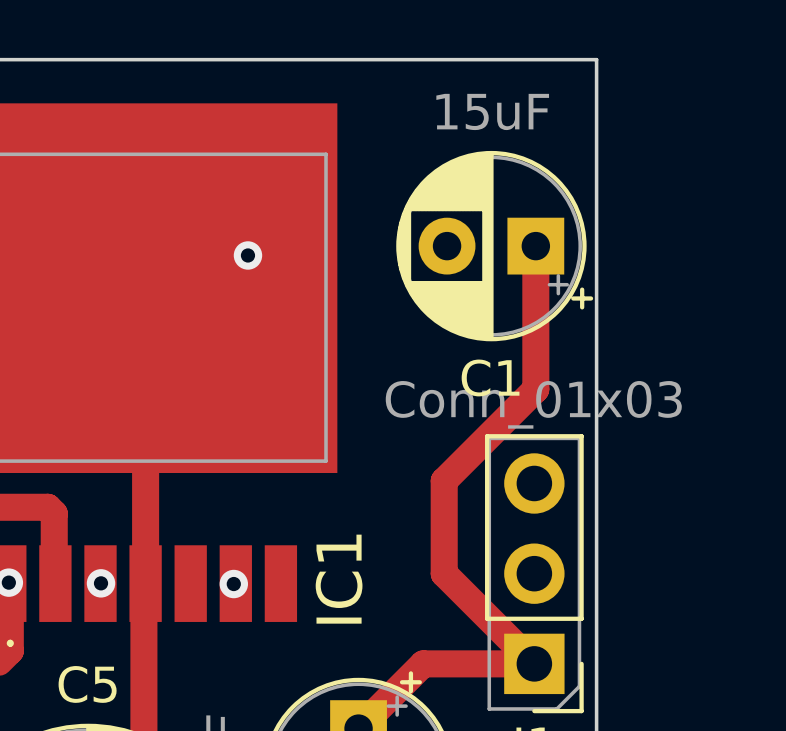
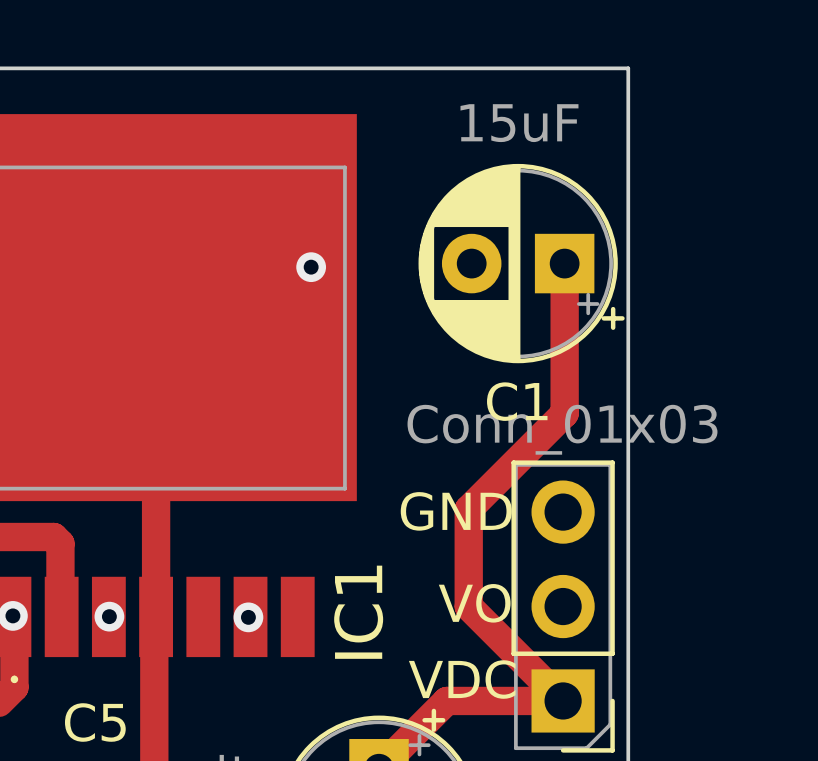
via position: (247, 255) -> (311, 267)
text: none -> GND (456, 511)
text: none -> VO (474, 603)
text: none -> VDC (462, 679)

